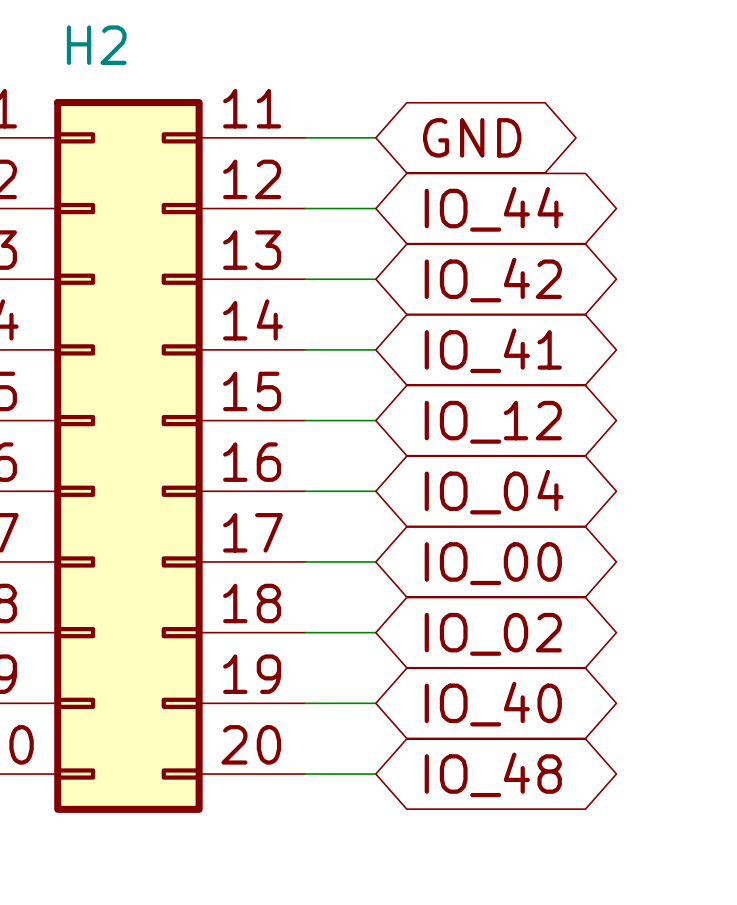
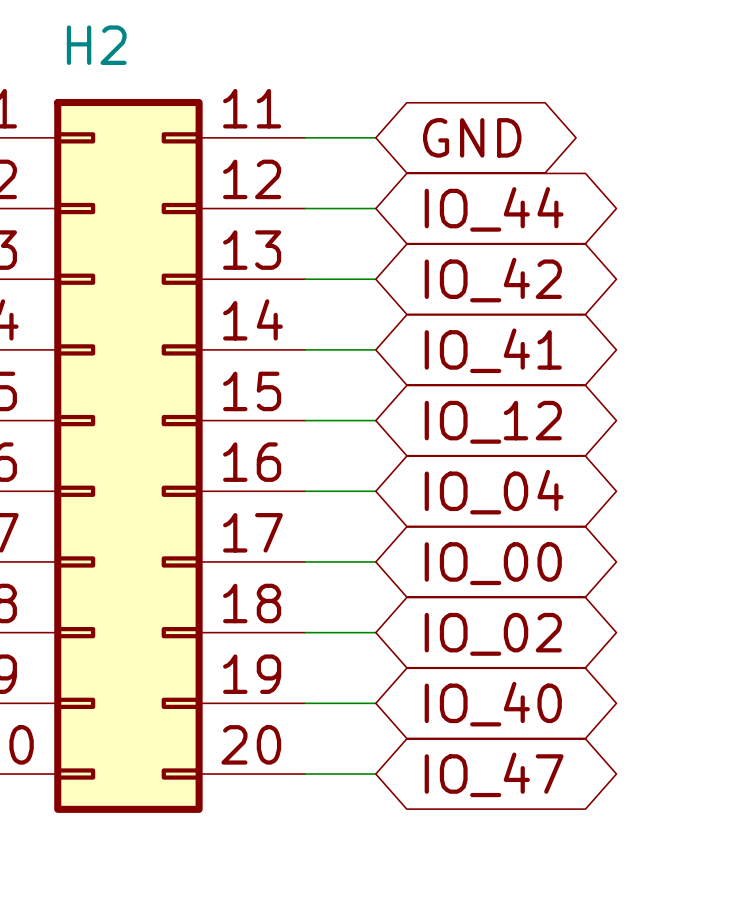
global label: IO_48 (493, 774) -> IO_47 (494, 774)

